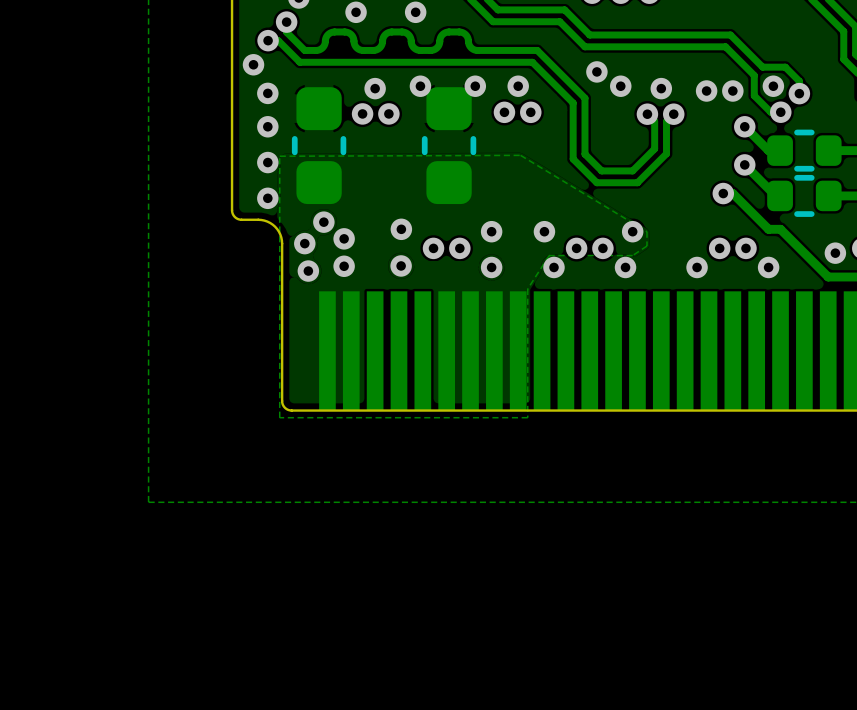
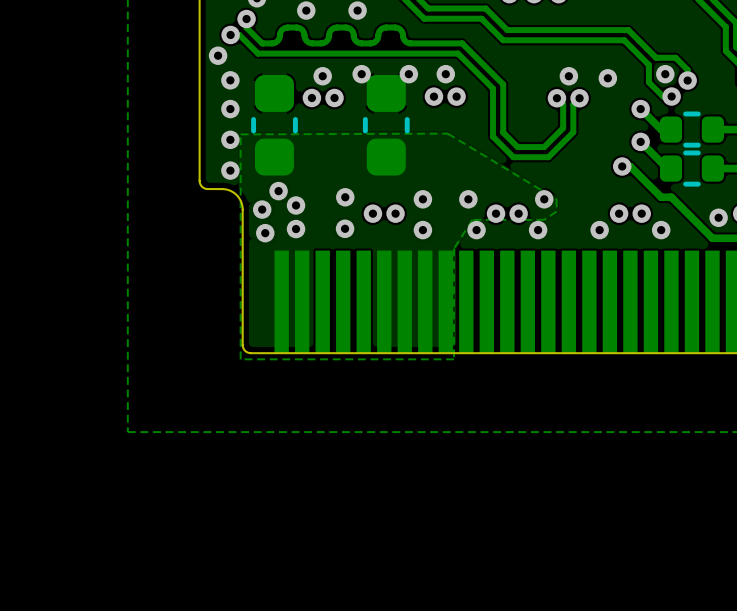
via: (596, 71) -> none
via: (620, 86) -> none
via: (732, 91) -> none

